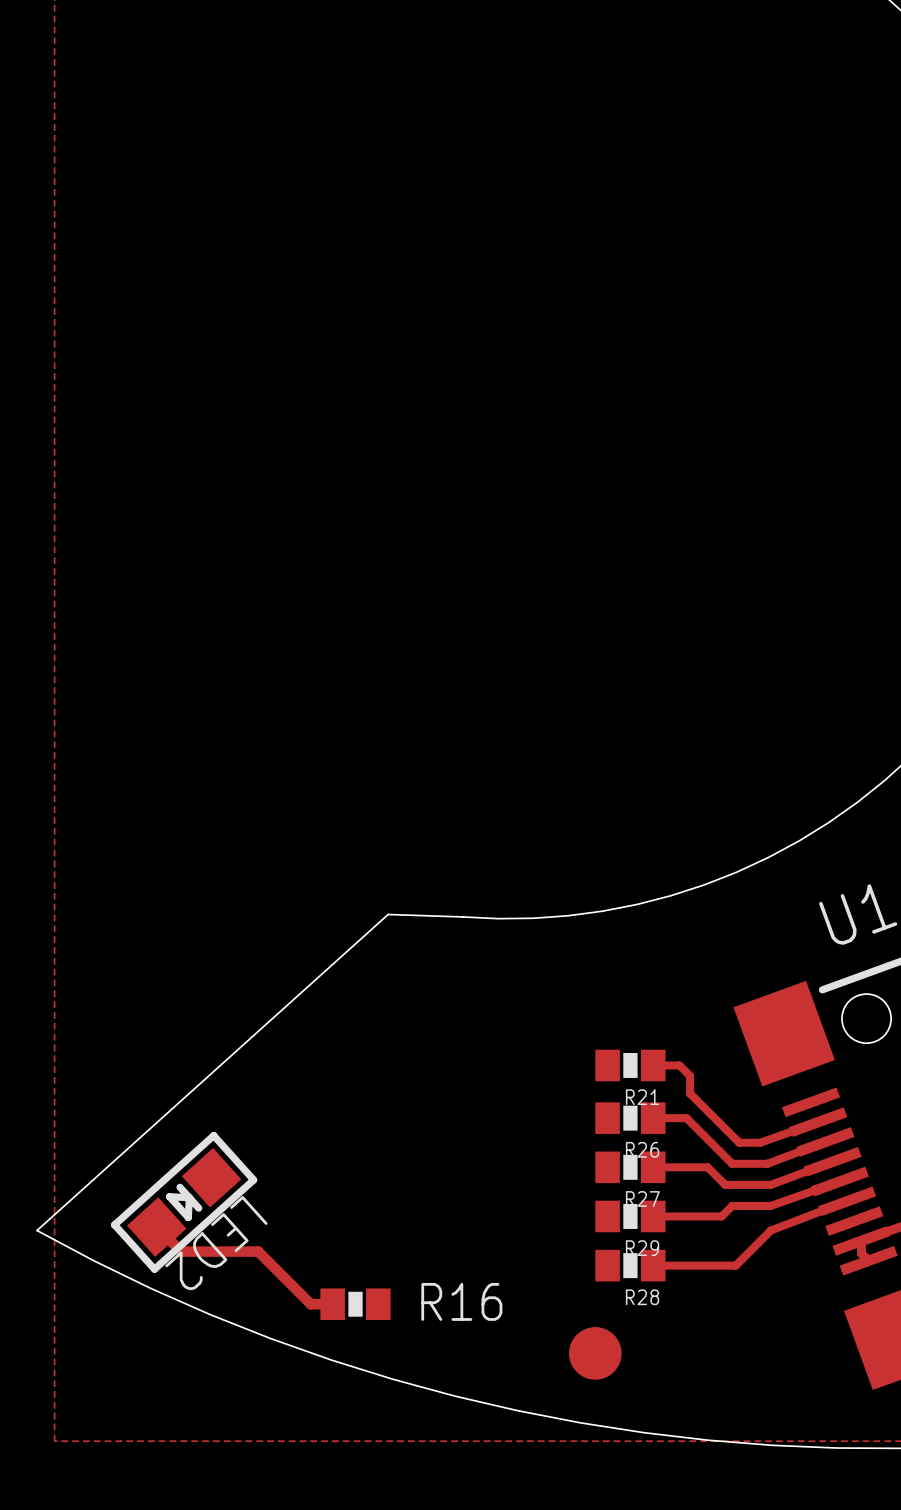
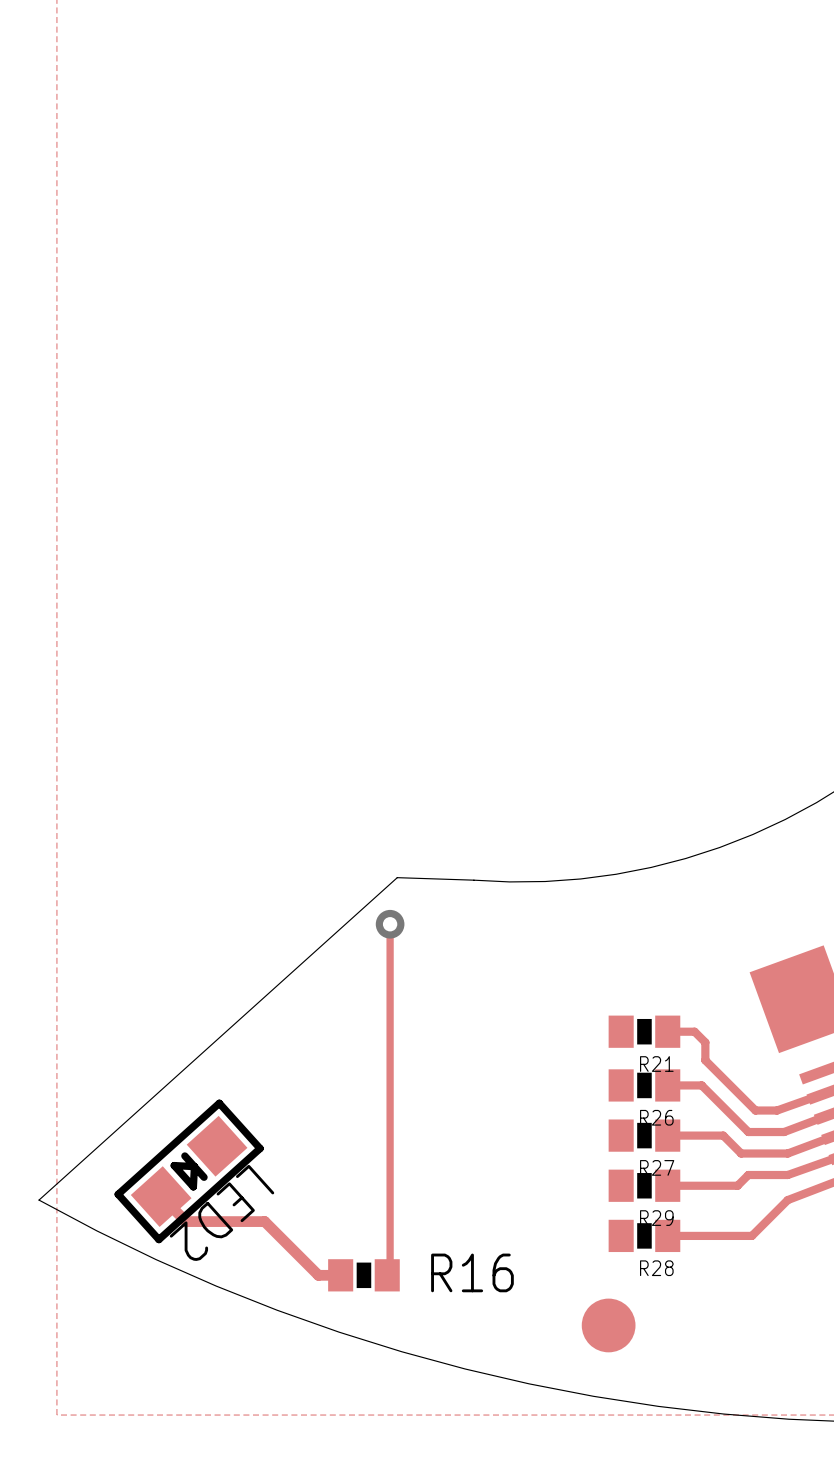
track: none -> (390, 924) (390, 1272) (387, 1275)
via: none -> (390, 924)

